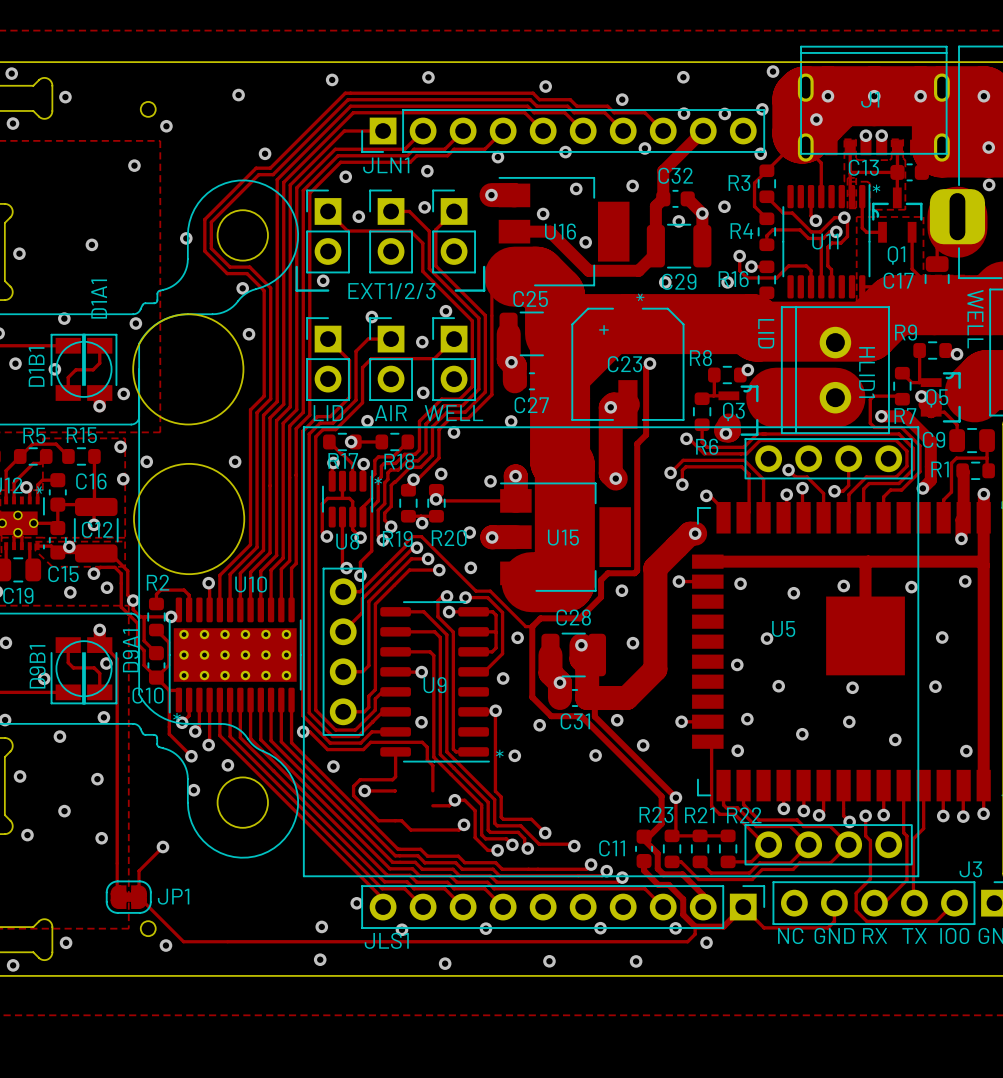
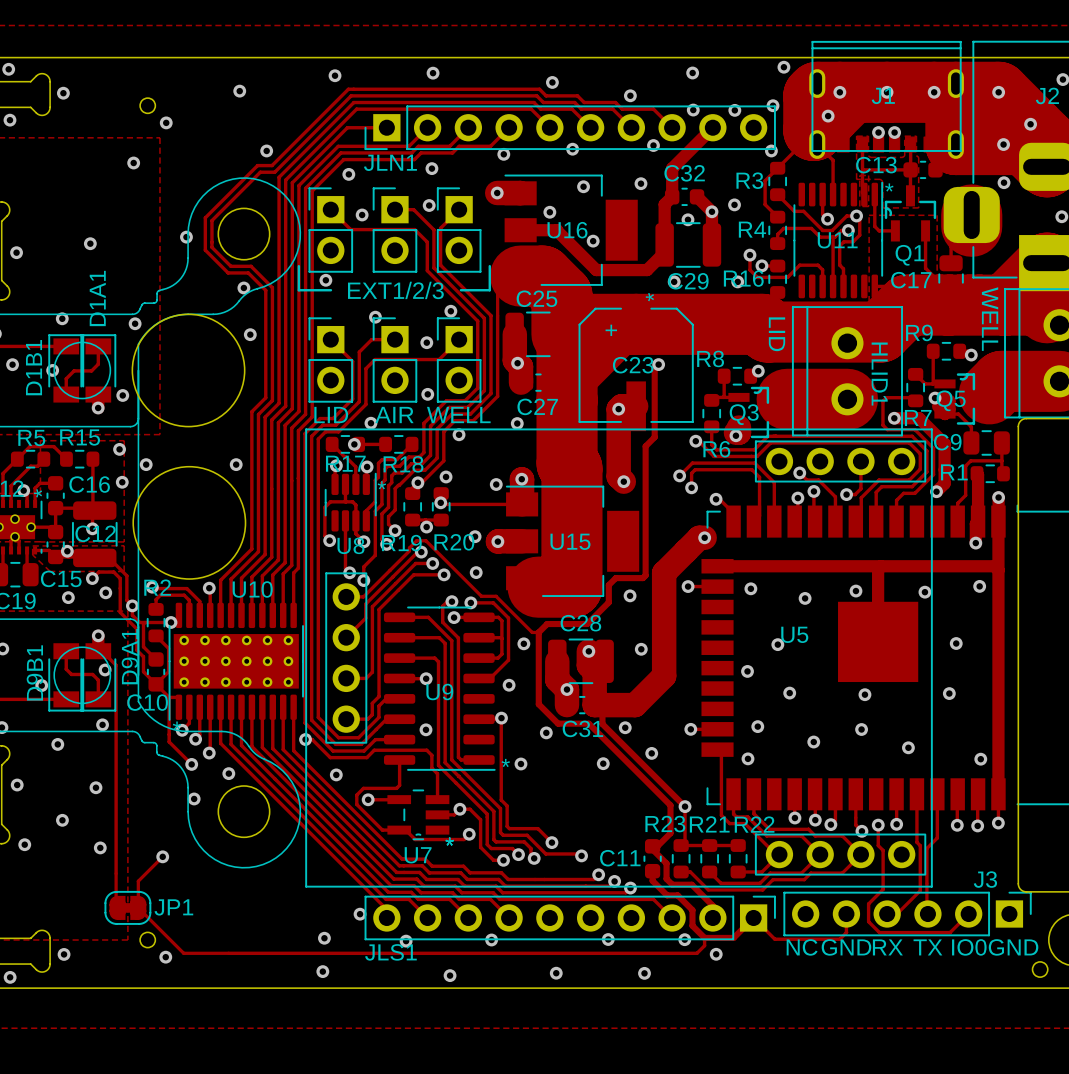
track: none -> (152, 587) (186, 588) (199, 601) (199, 615)
via: none -> (152, 587)
U7: none -> (418, 814)

